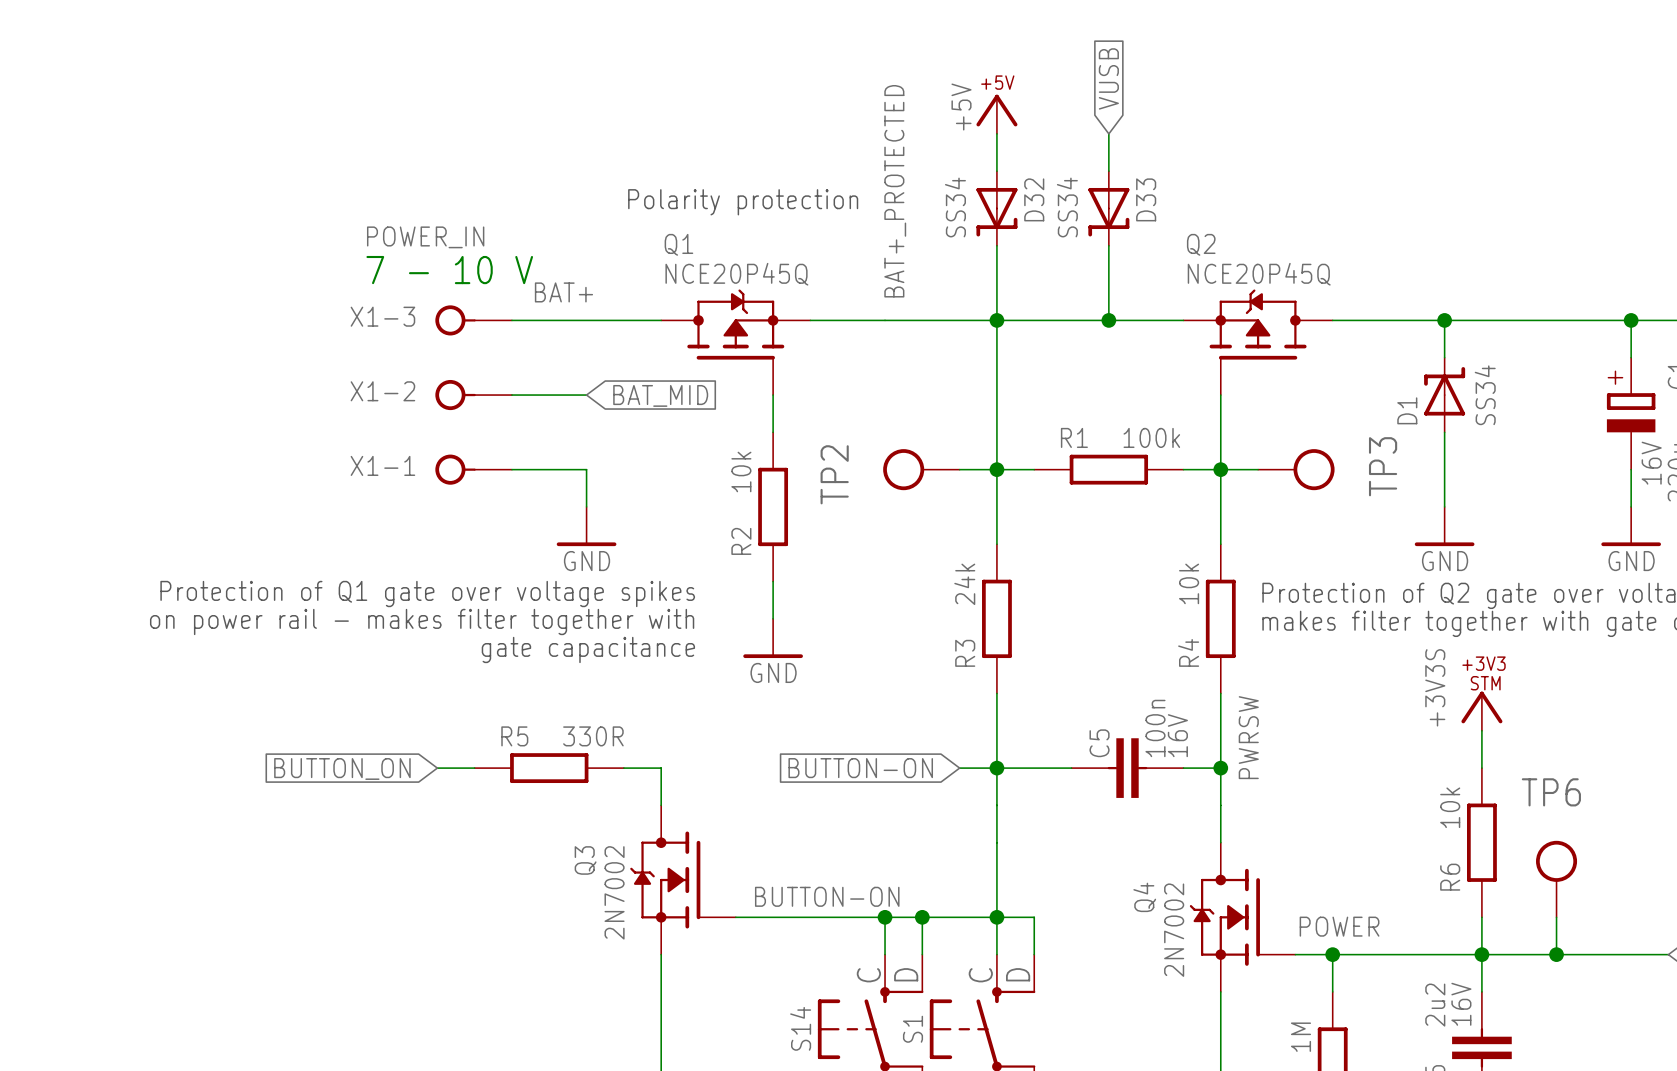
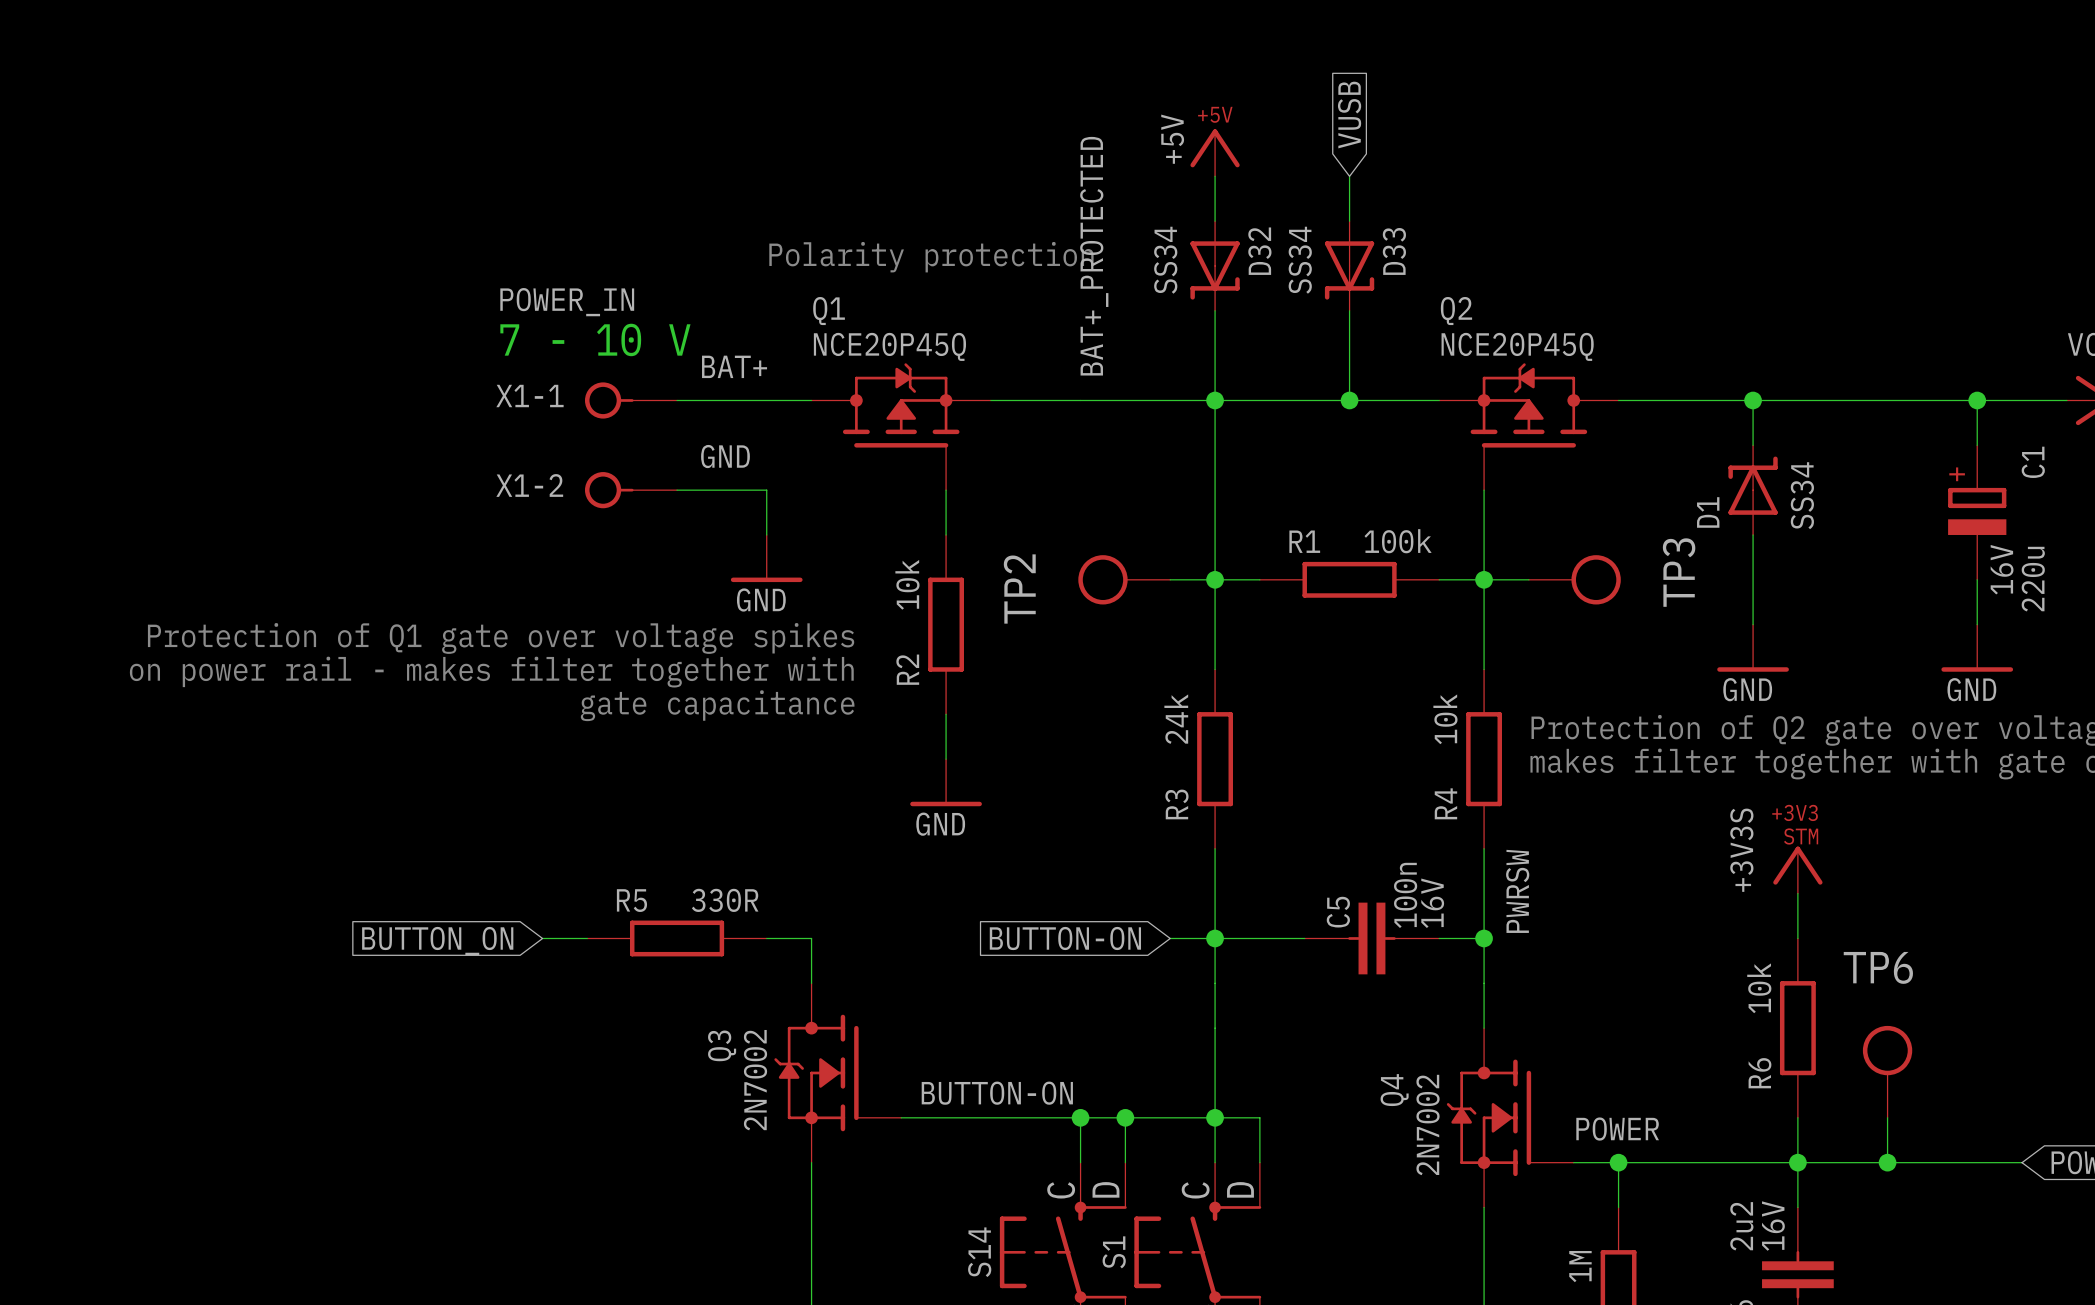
text position: 7 - 10 V (449, 270) -> 7 - 10 V (595, 339)
label position: BAT+ (563, 292) -> BAT+ (734, 366)
X1-3: (473, 320) -> none
label: none -> GND (725, 456)
X1-2 position: (473, 395) -> (631, 490)
wire: none -> (721, 490) (766, 490) (766, 534)
global label: BAT_MID (660, 395) -> none
X1-1 position: (473, 469) -> (631, 400)
wire: (511, 469) (586, 469) (586, 506) -> none
power symbol position: GND (586, 526) -> GND (766, 558)
text position: Protection of Q1 gate over voltage spikes (427, 594) -> Protection of Q1 gate over voltage spikes (501, 638)
text position: on power rail - makes filter together with (422, 621) -> on power rail - makes filter together with (491, 672)
text position: gate capacitance (588, 649) -> gate capacitance (717, 705)

